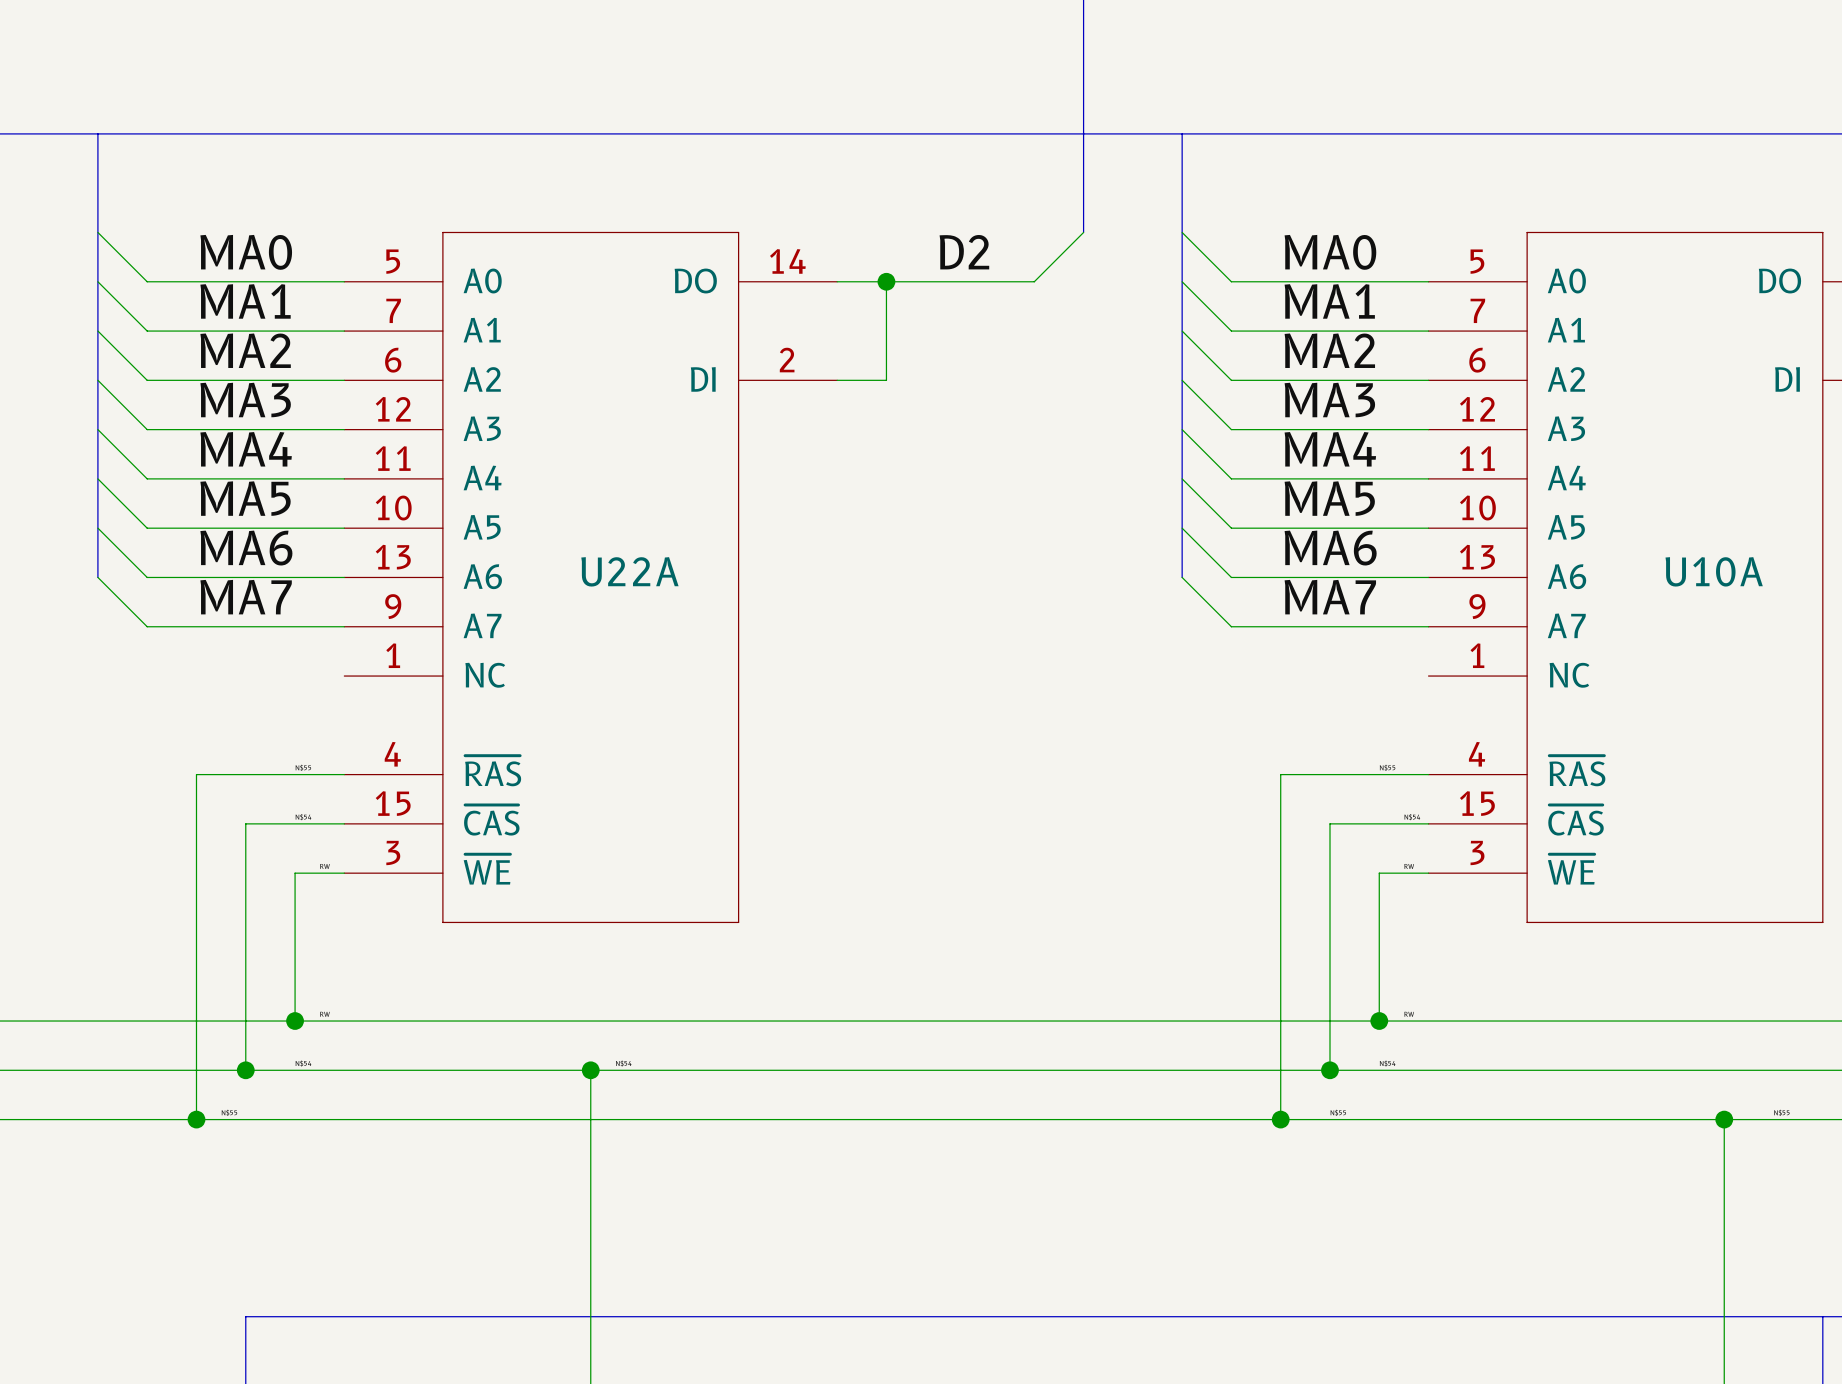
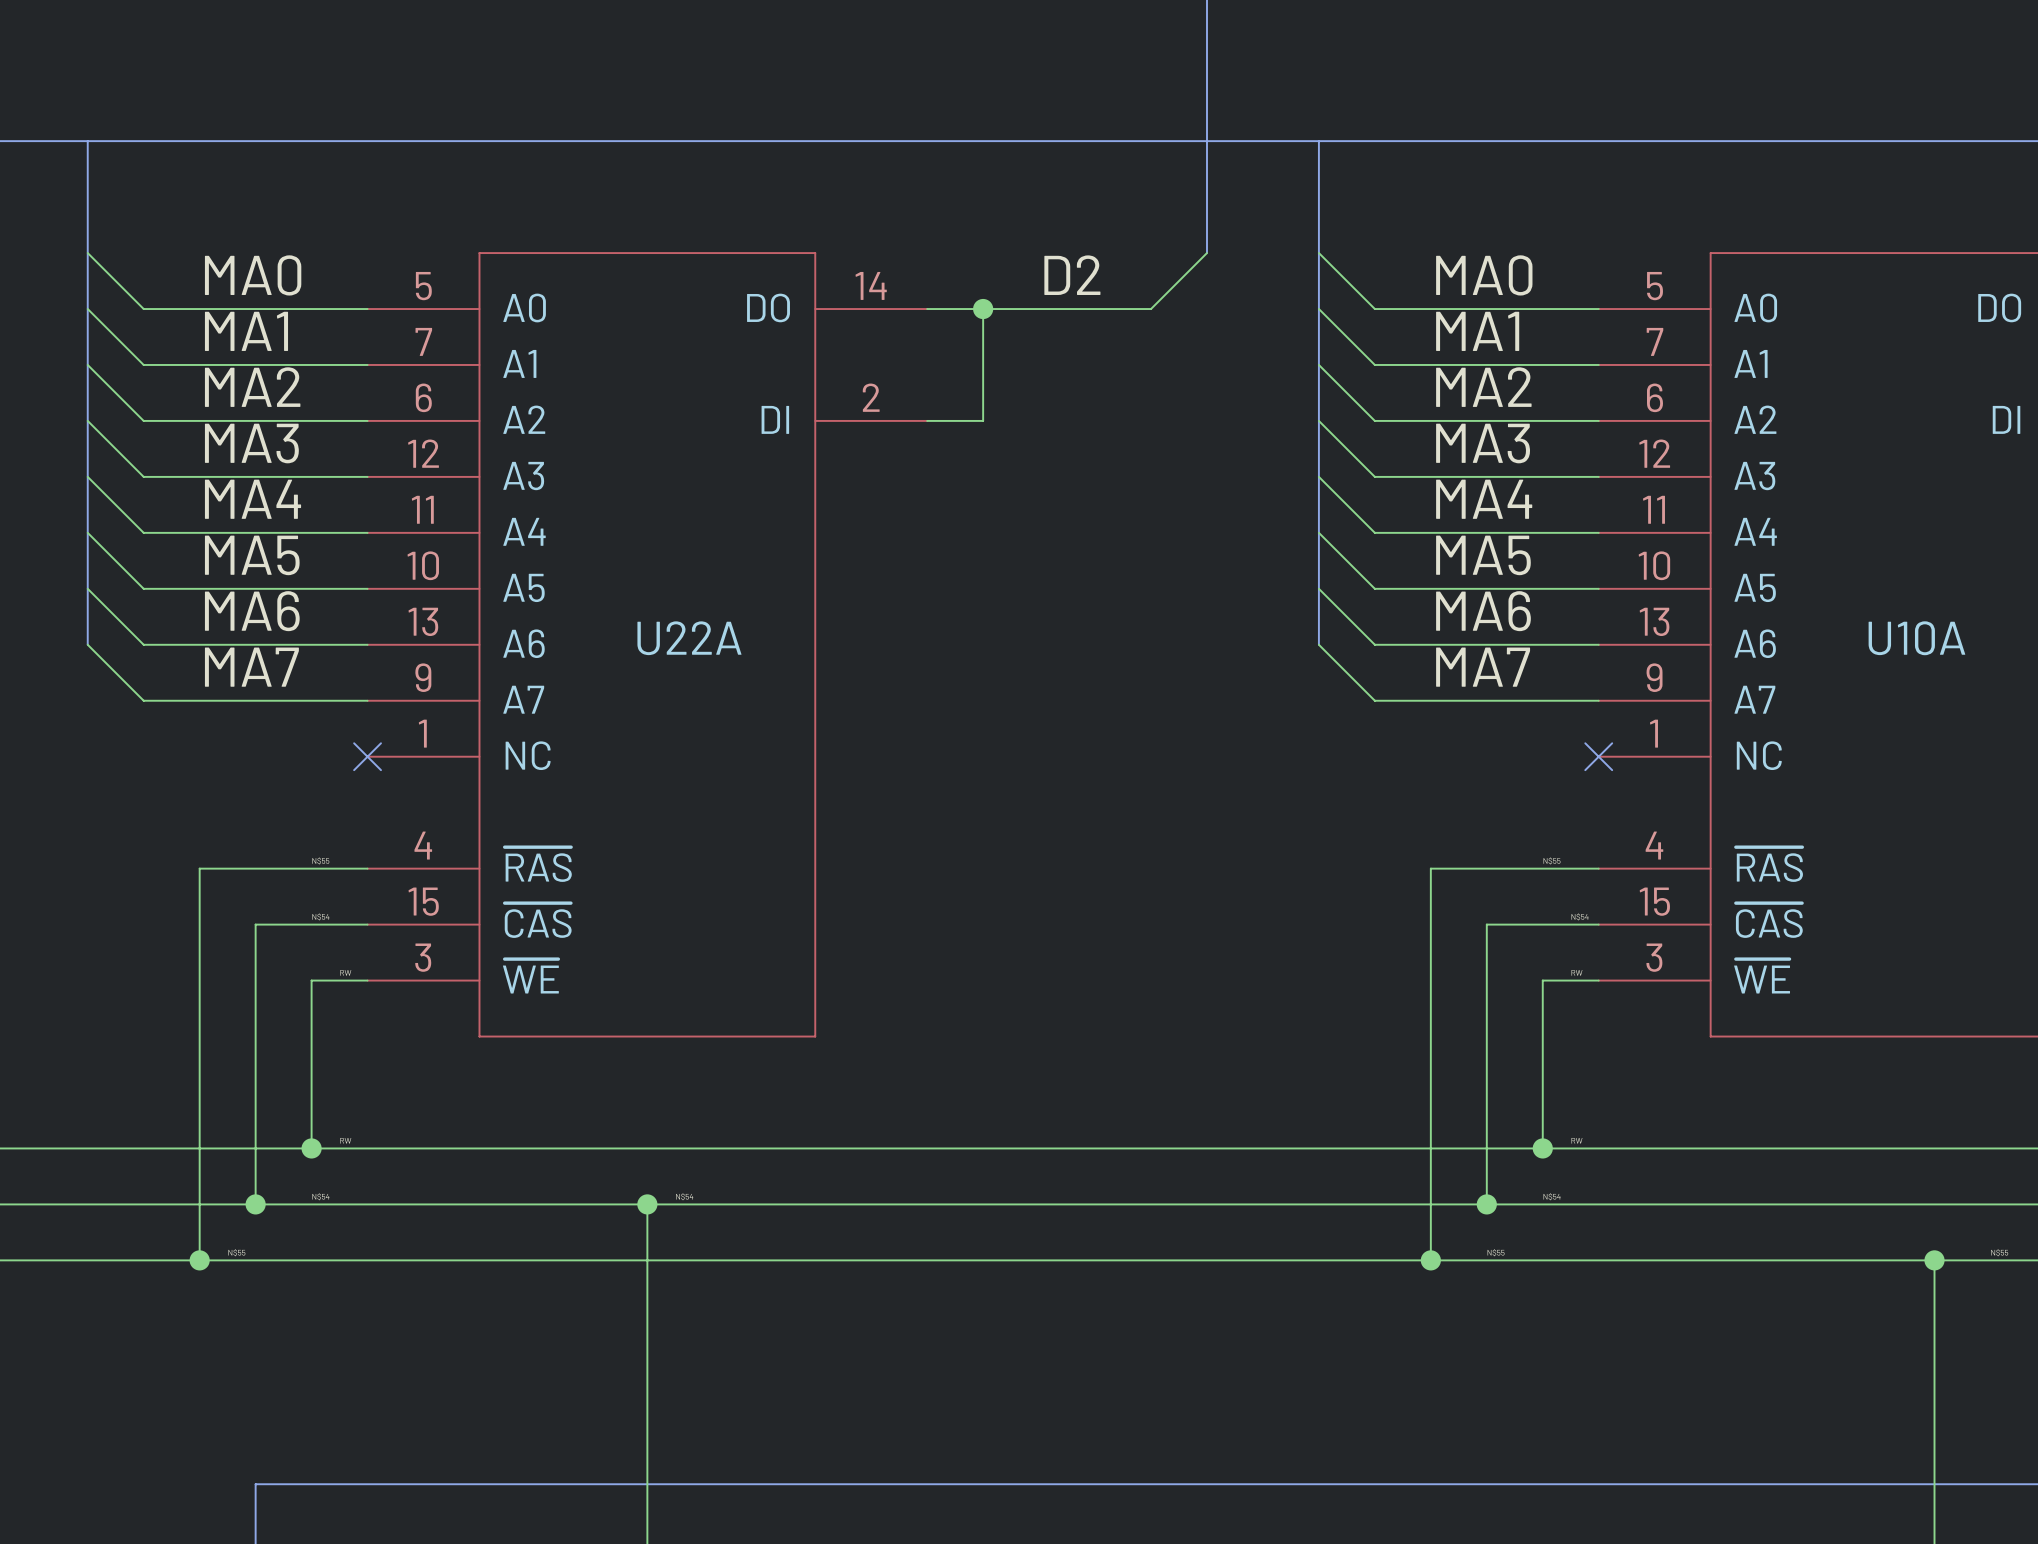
no-connect mark: none -> (367, 756)
no-connect mark: none -> (1598, 756)

